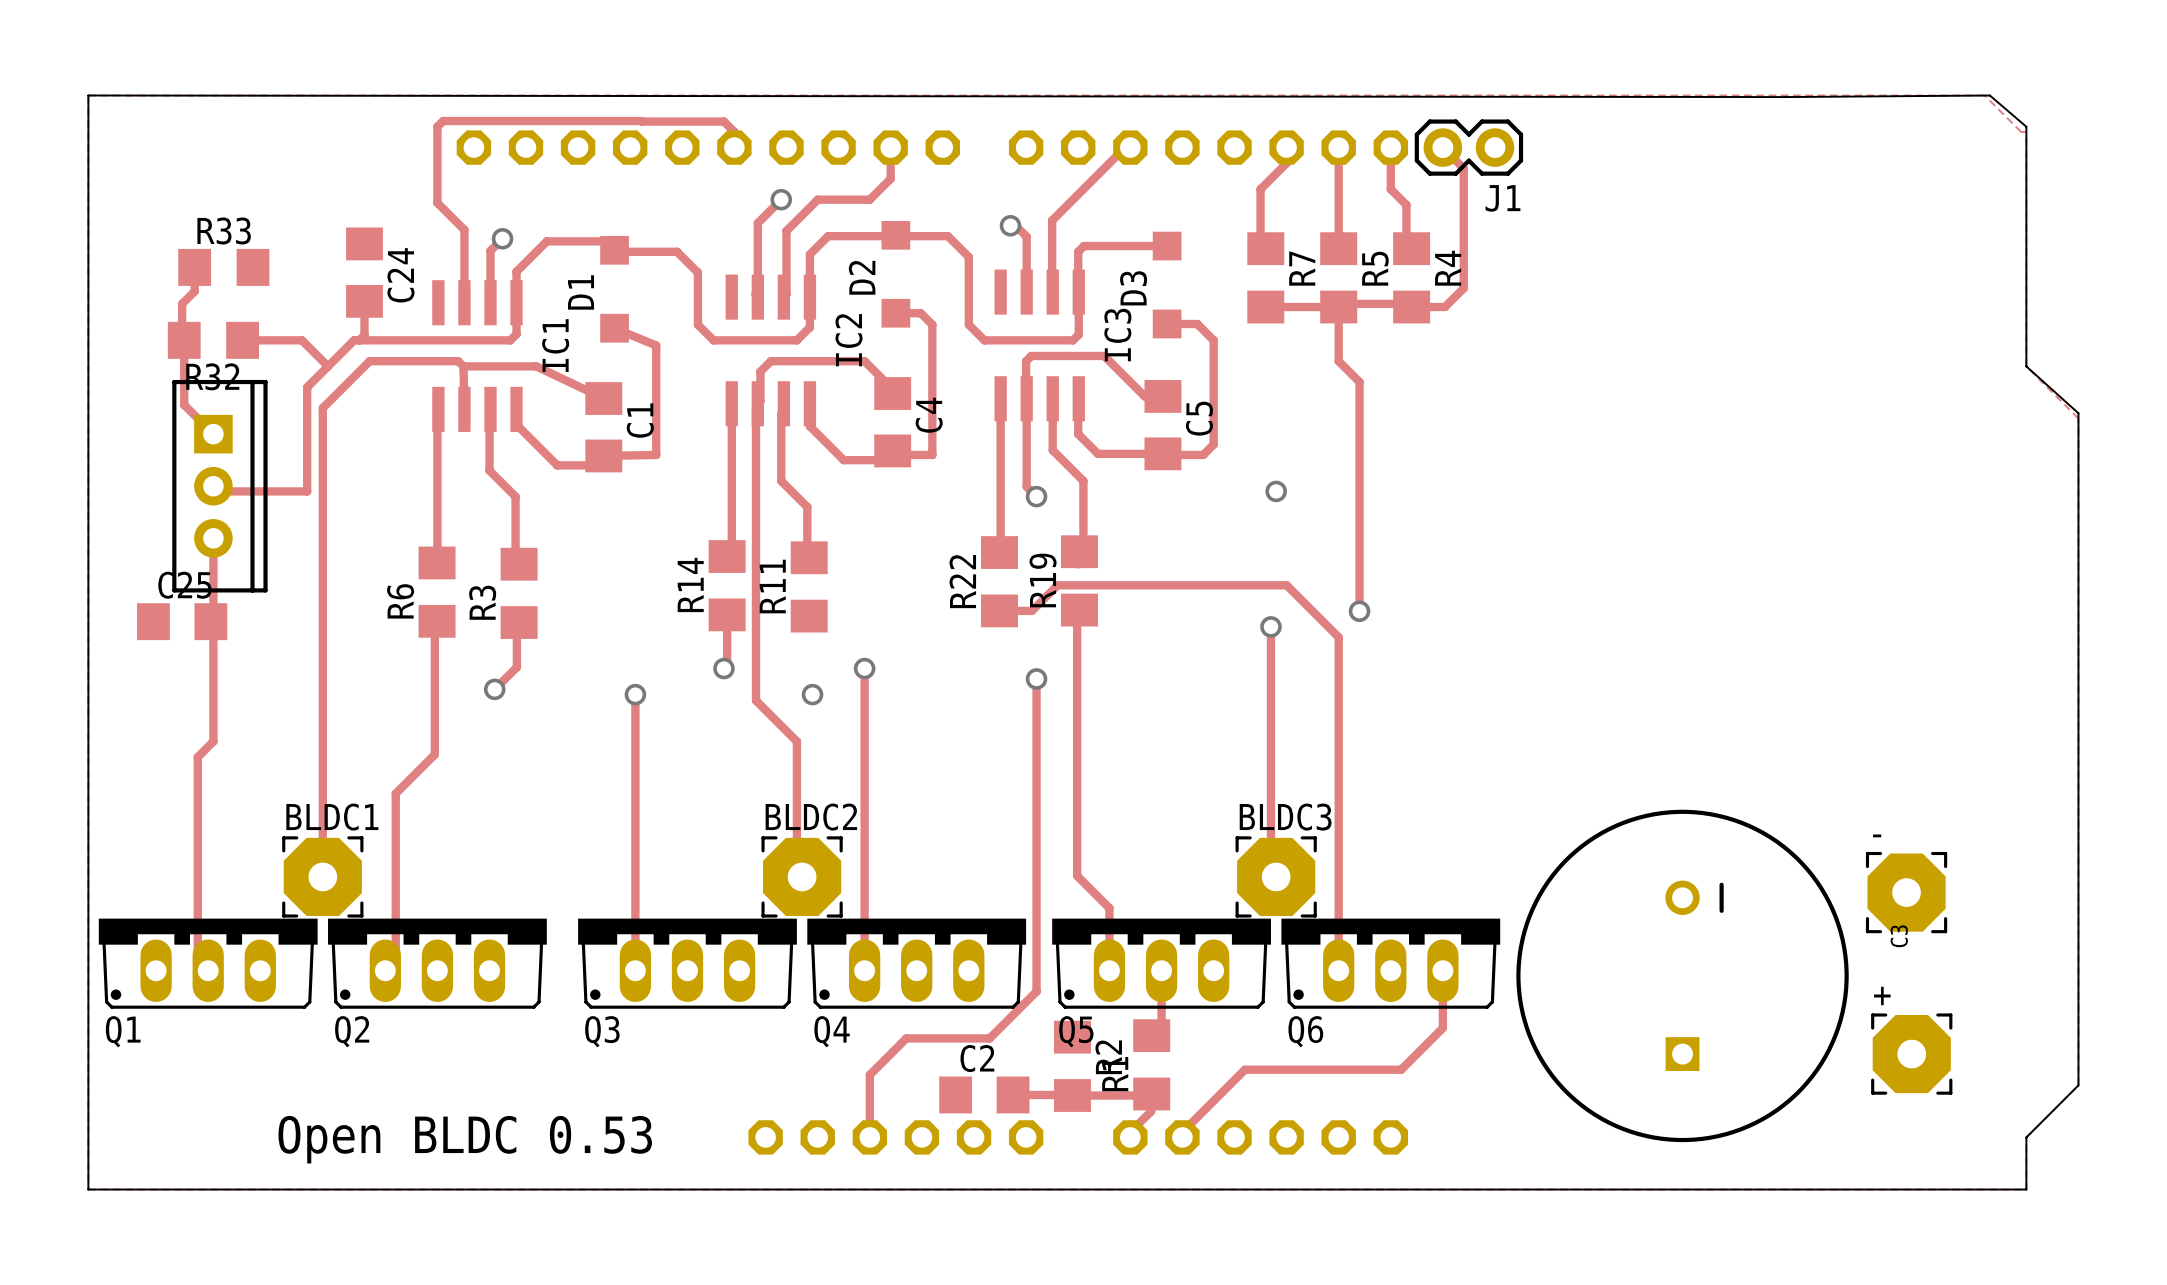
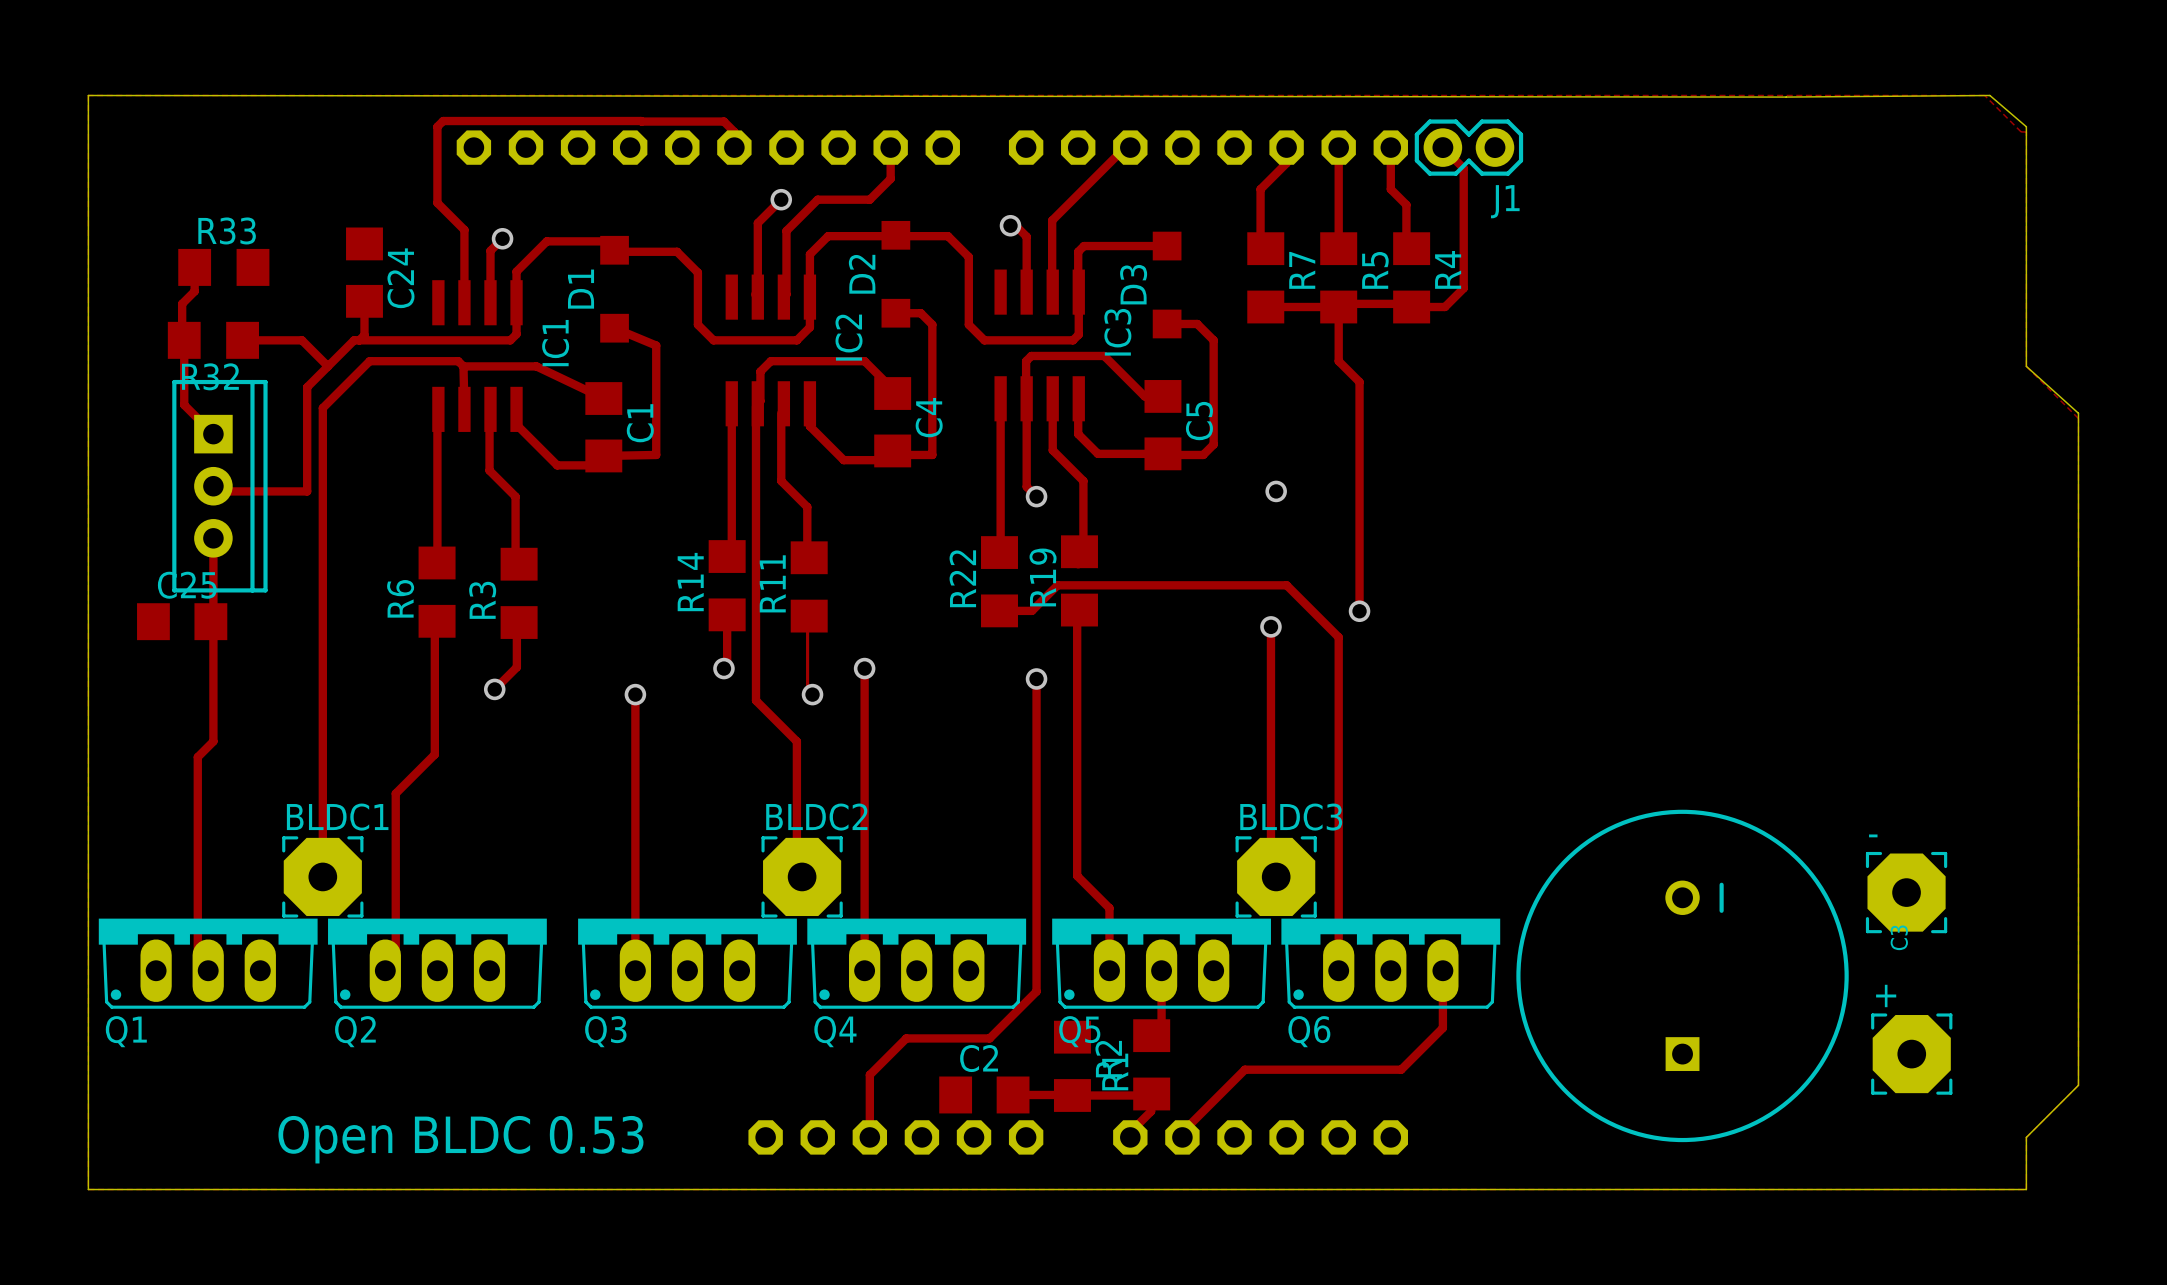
track: none -> (807, 617) (807, 689) (812, 694)

